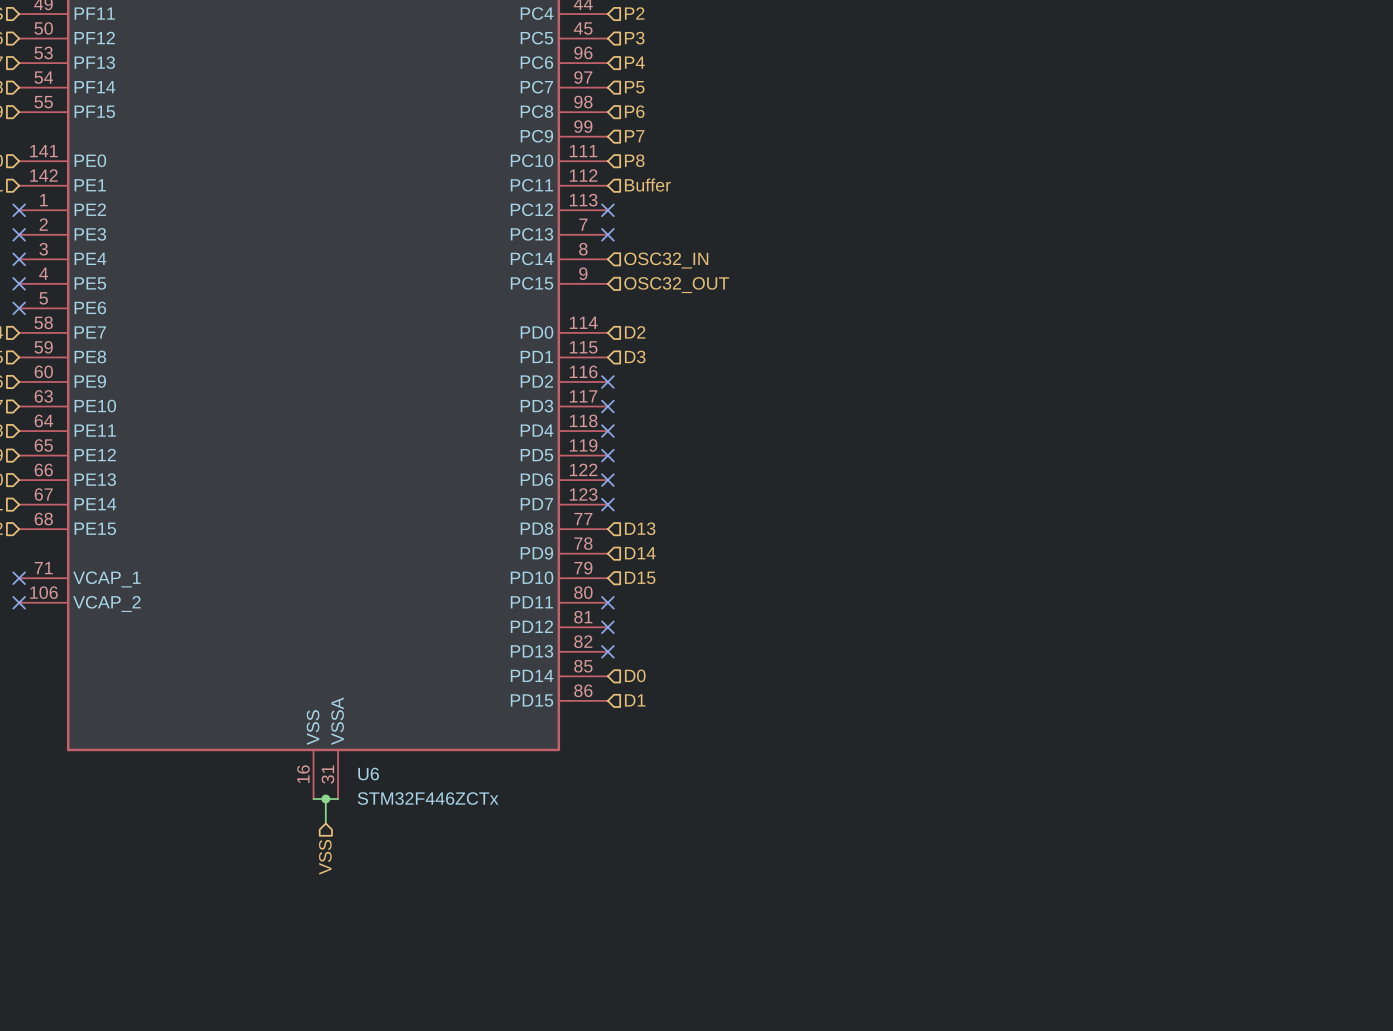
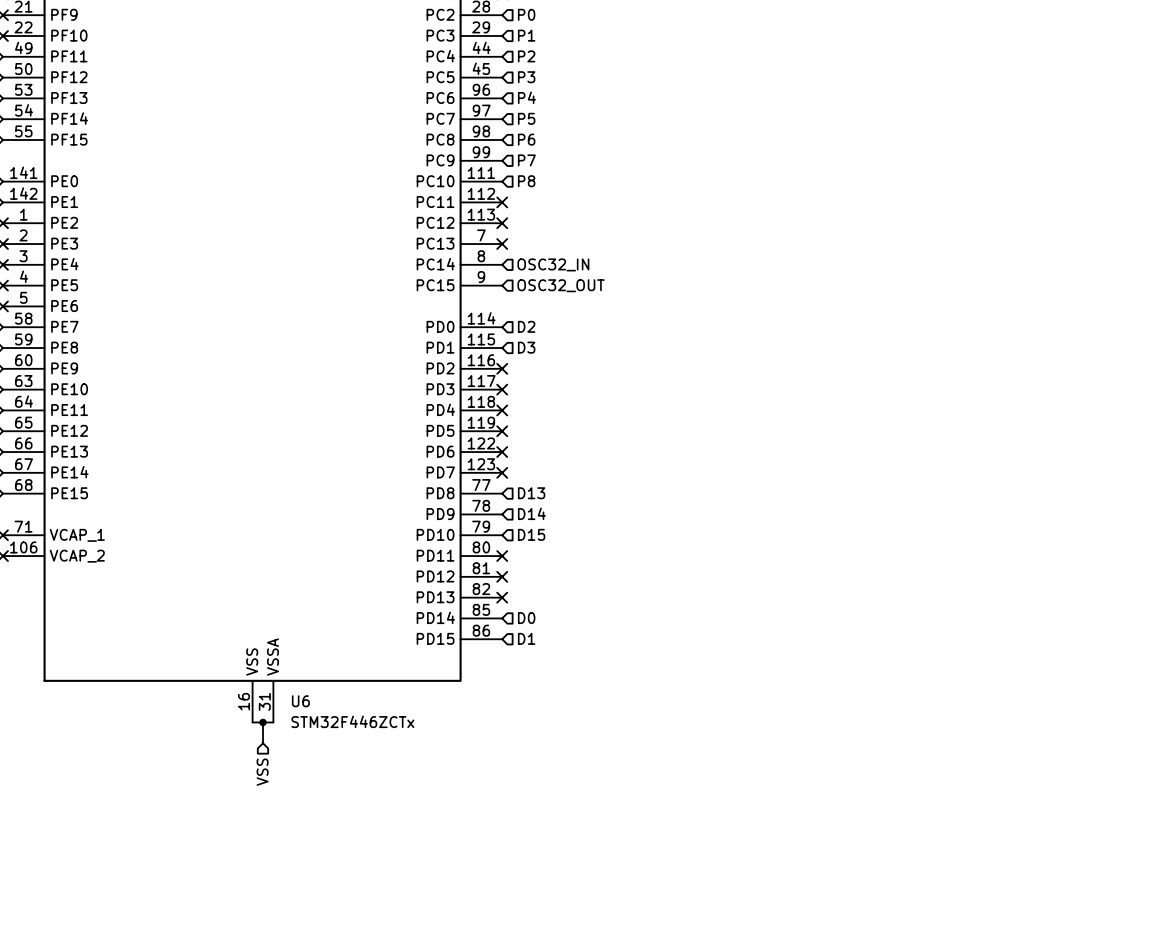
no-connect mark: none -> (502, 202)
hierarchical label: Buffer (647, 185) -> none

